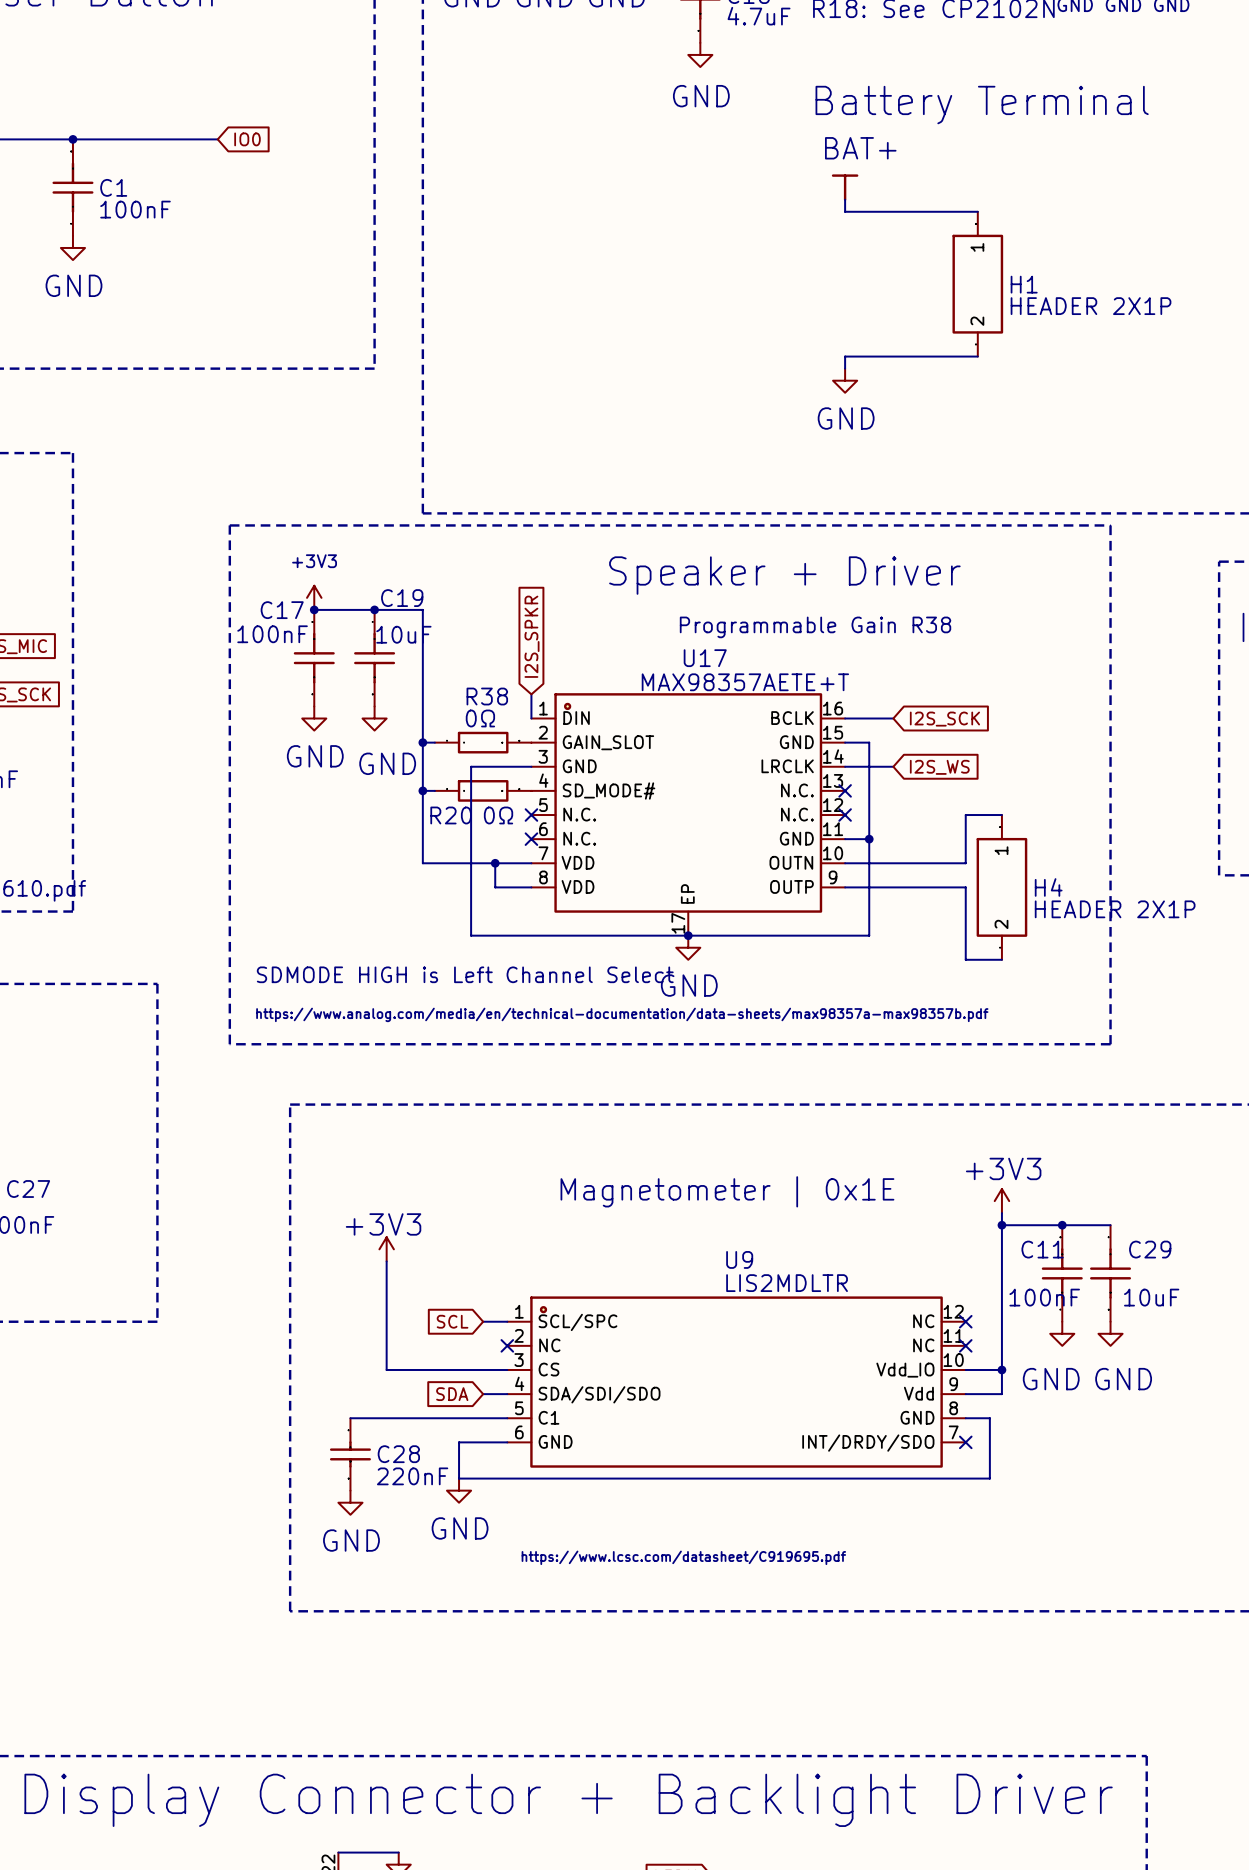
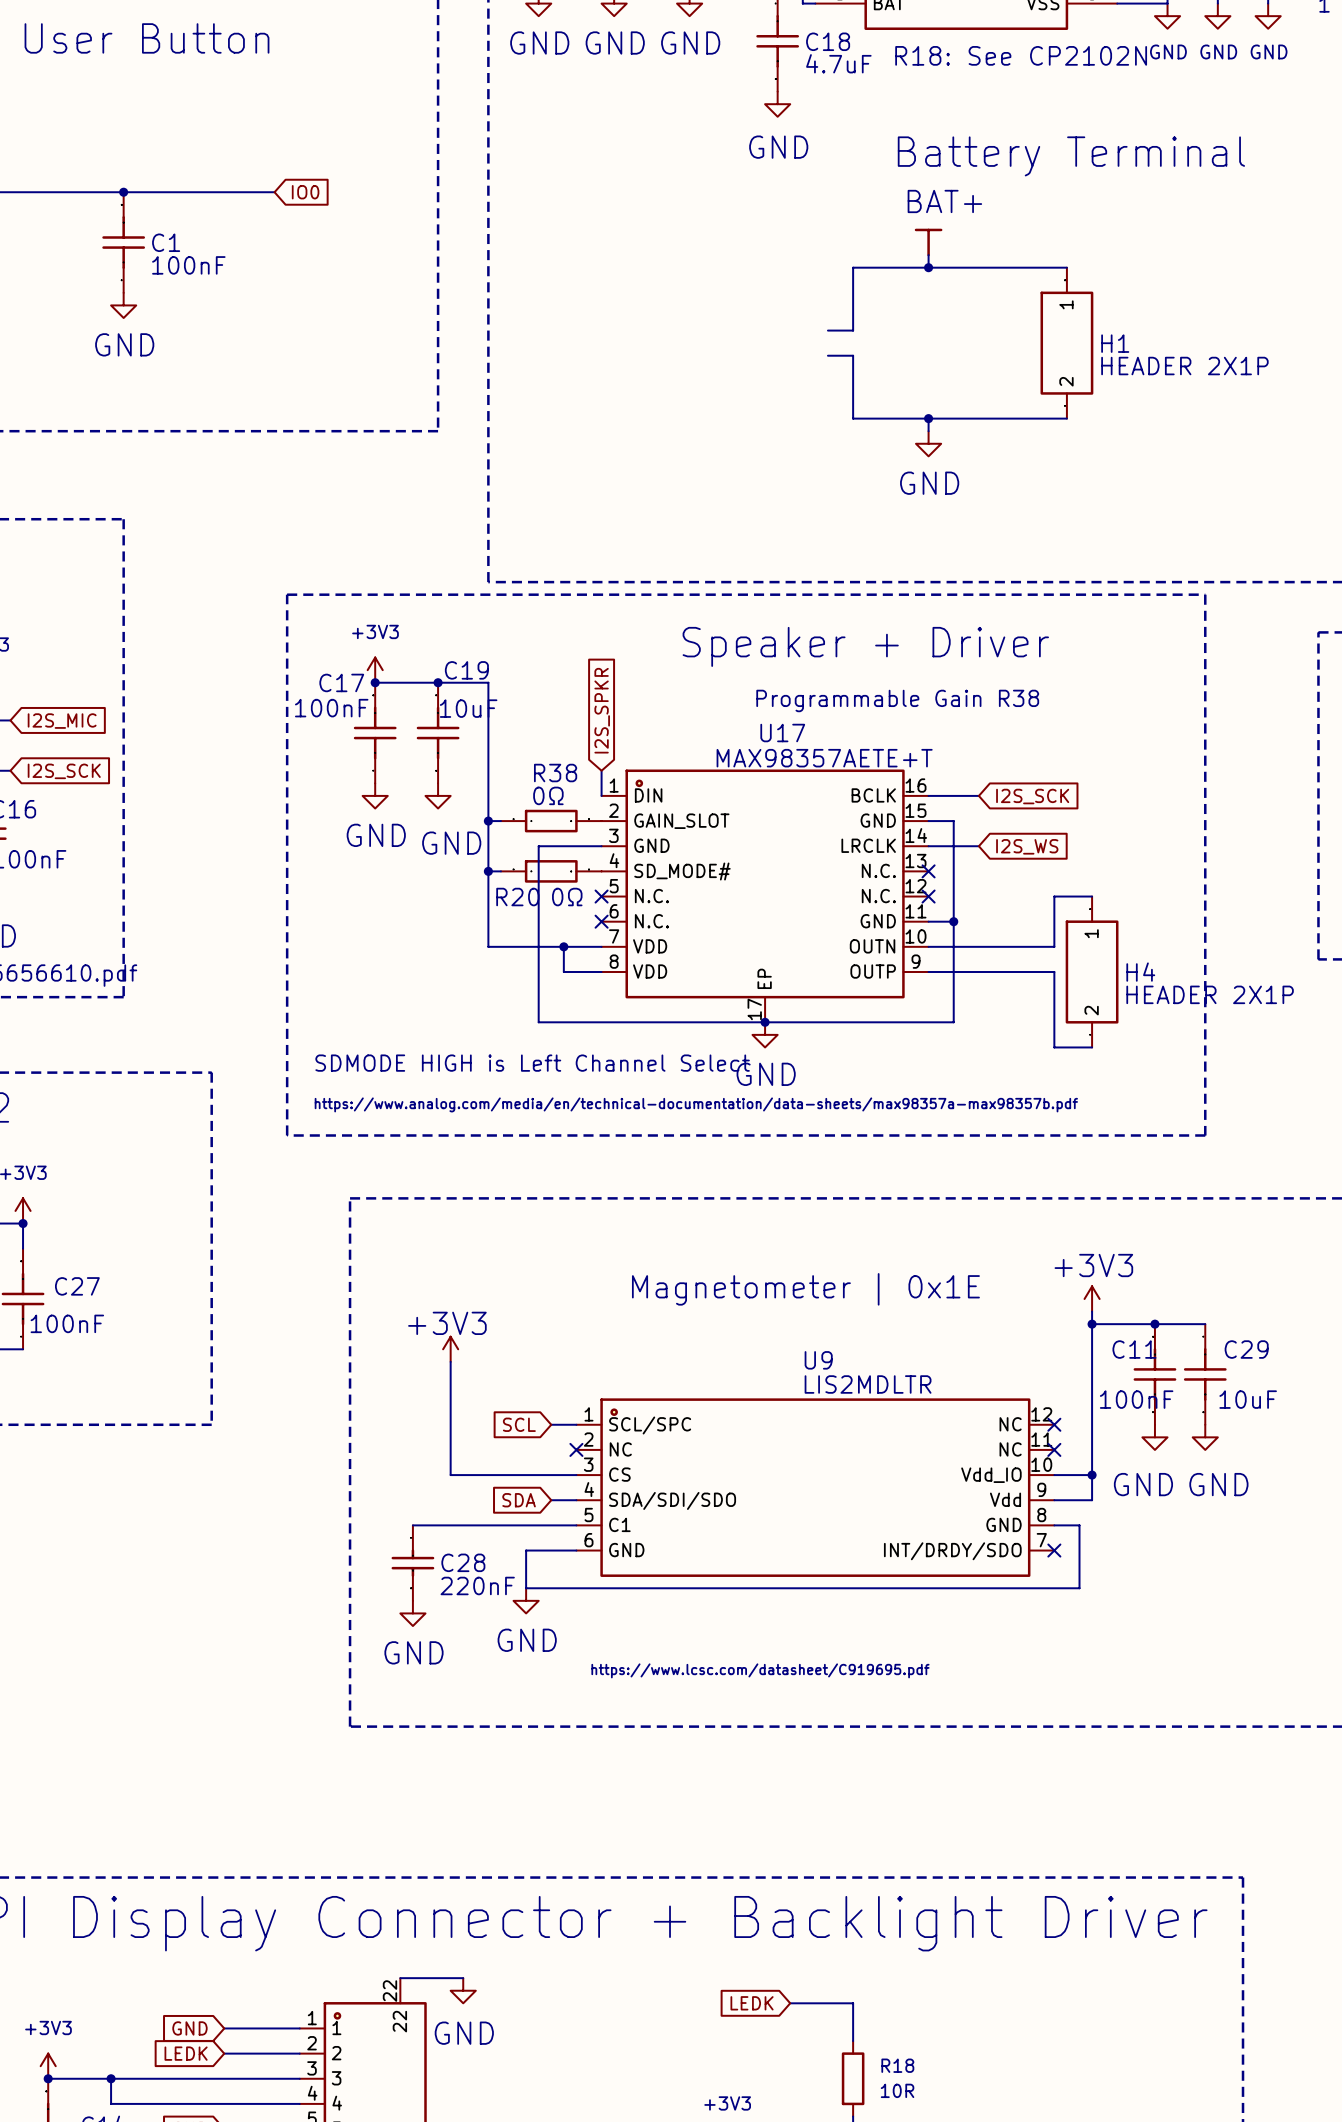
wire: none -> (928, 267) (853, 267) (853, 330) (827, 330)
junction: none -> (928, 267)
wire: none -> (827, 355) (853, 355) (853, 418) (928, 418)
junction: none -> (928, 418)

